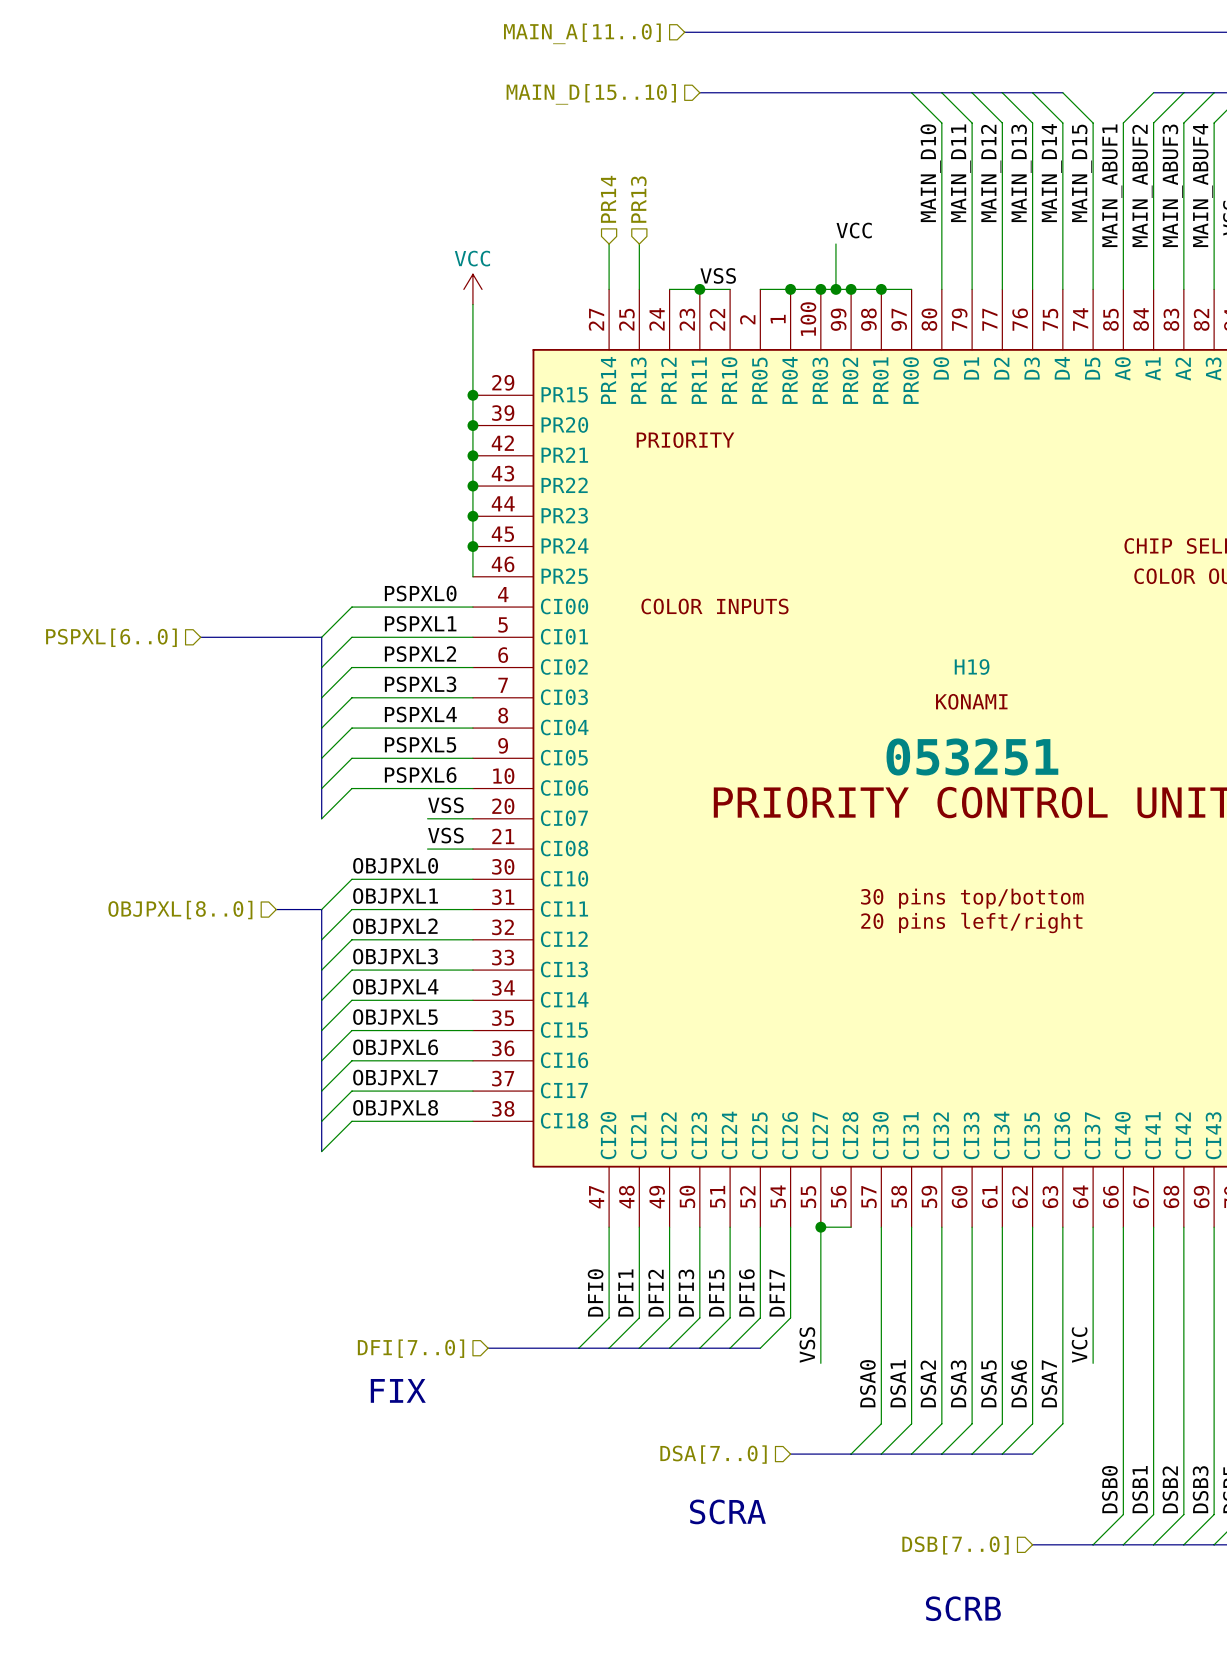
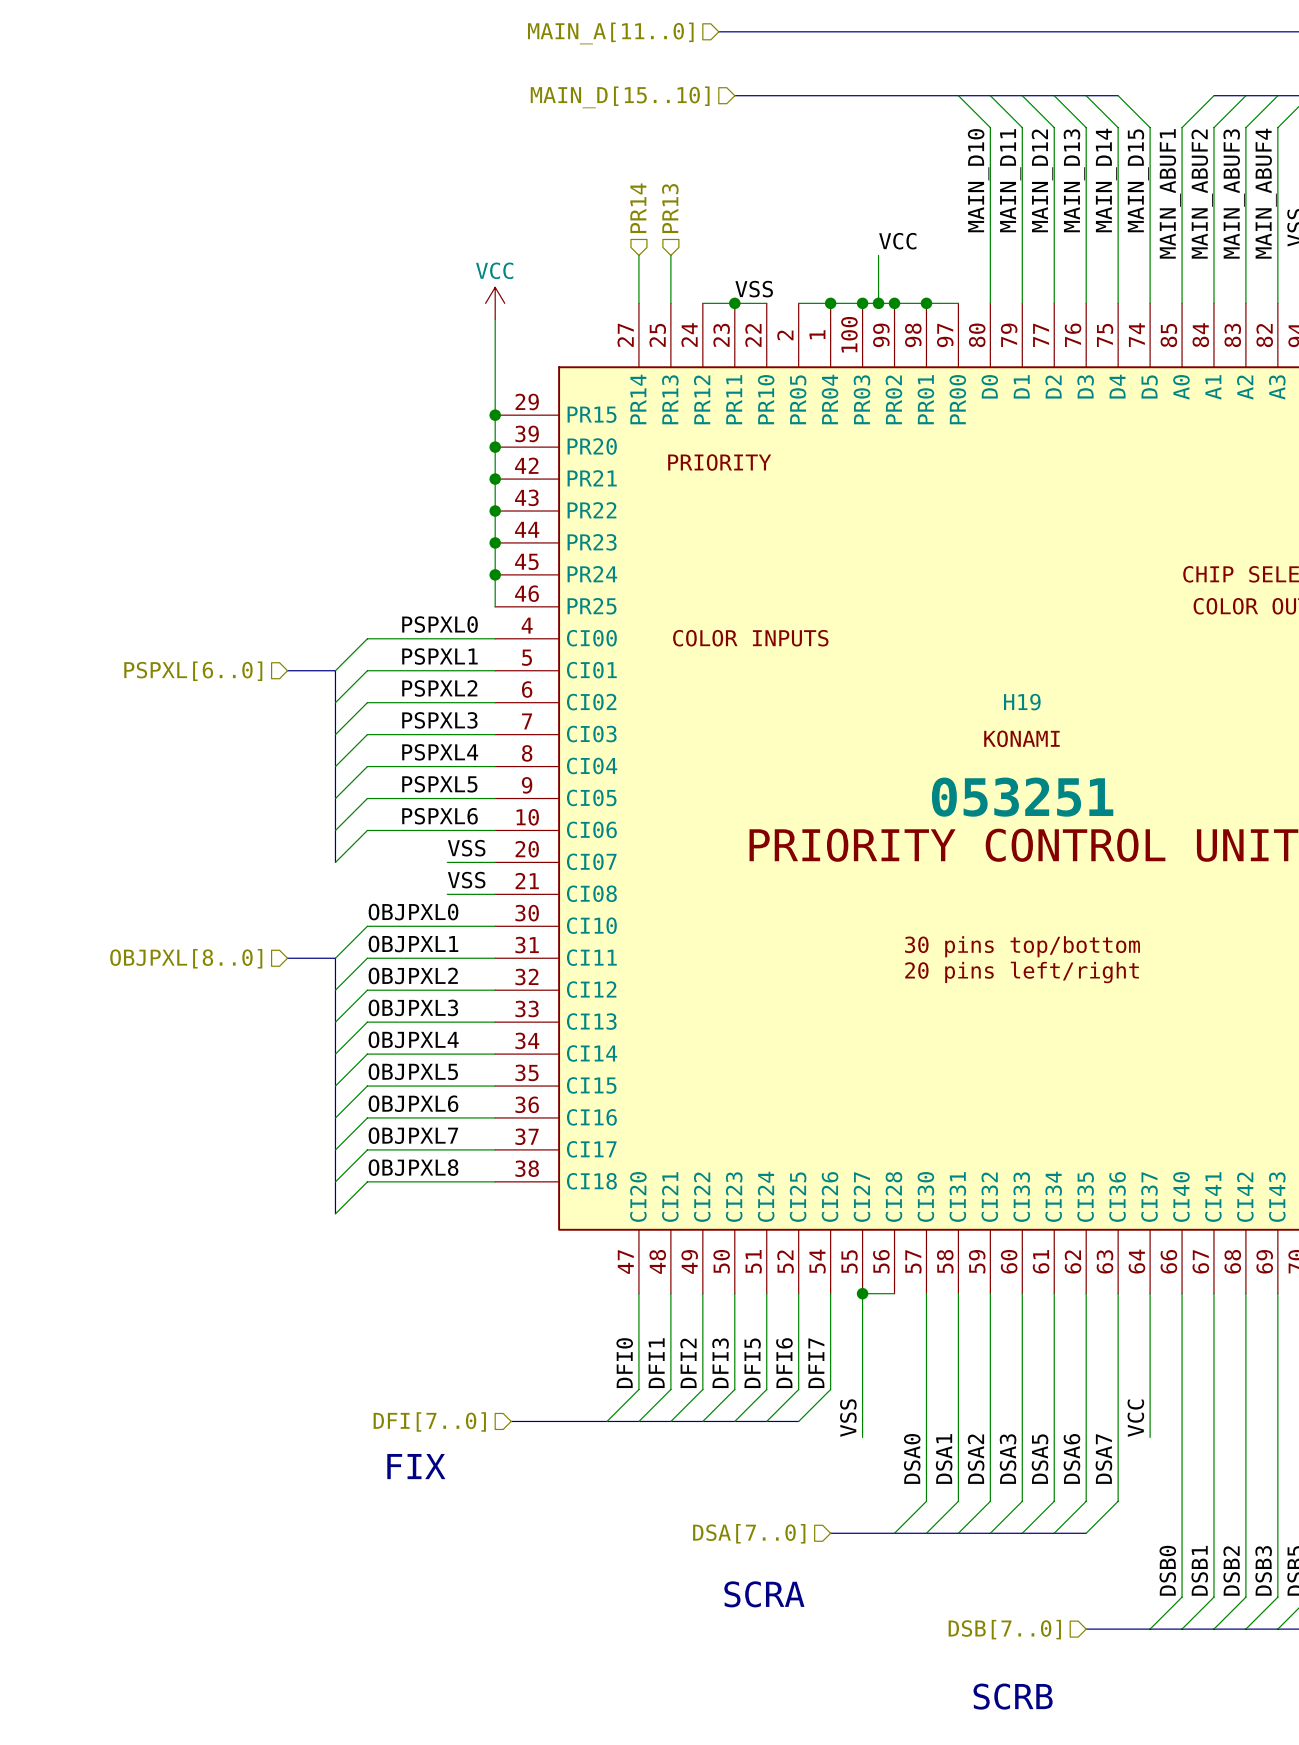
hierarchical label position: PSPXL[6..0] (111, 637) -> PSPXL[6..0] (193, 671)
bus: (200, 637) (276, 637) -> none

